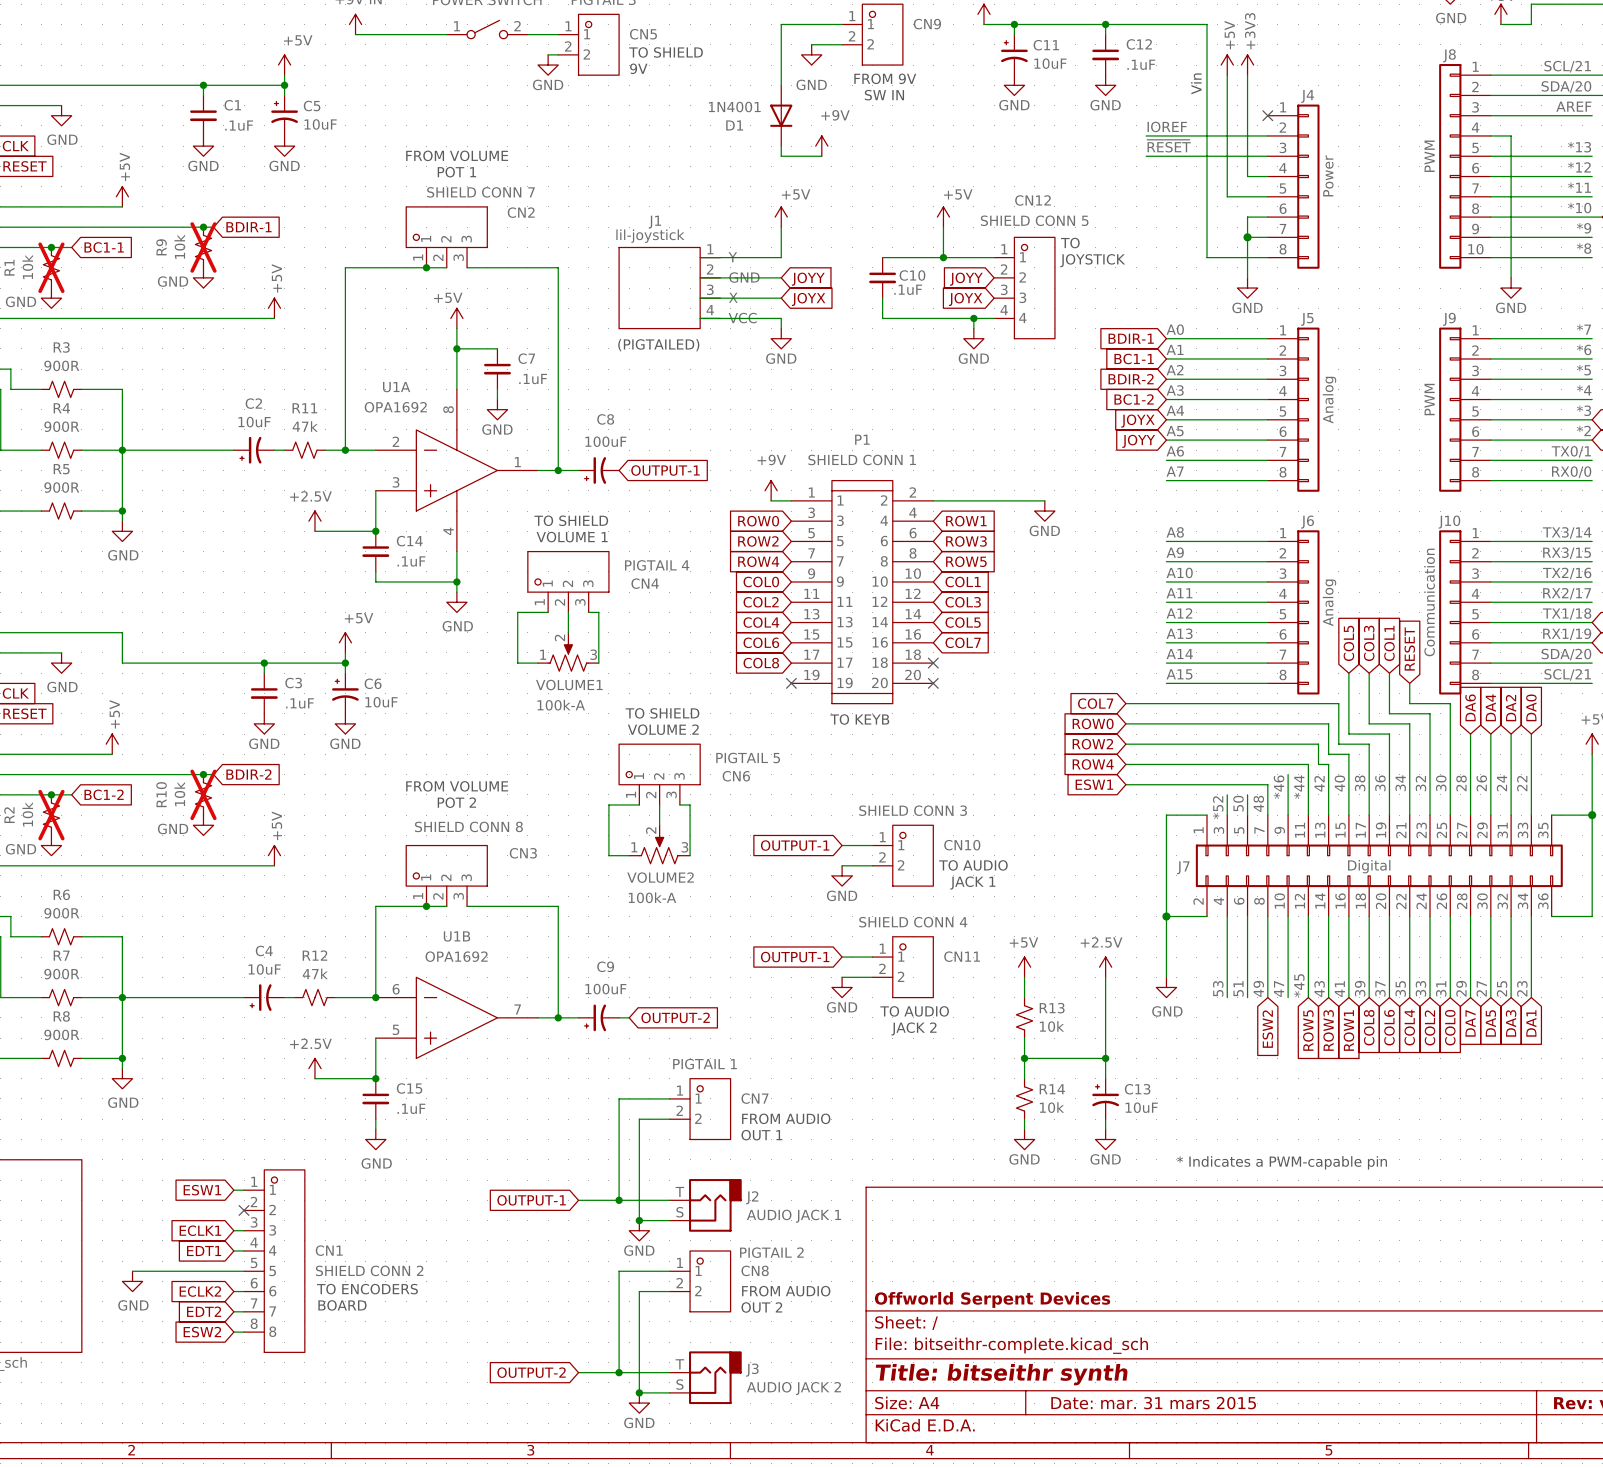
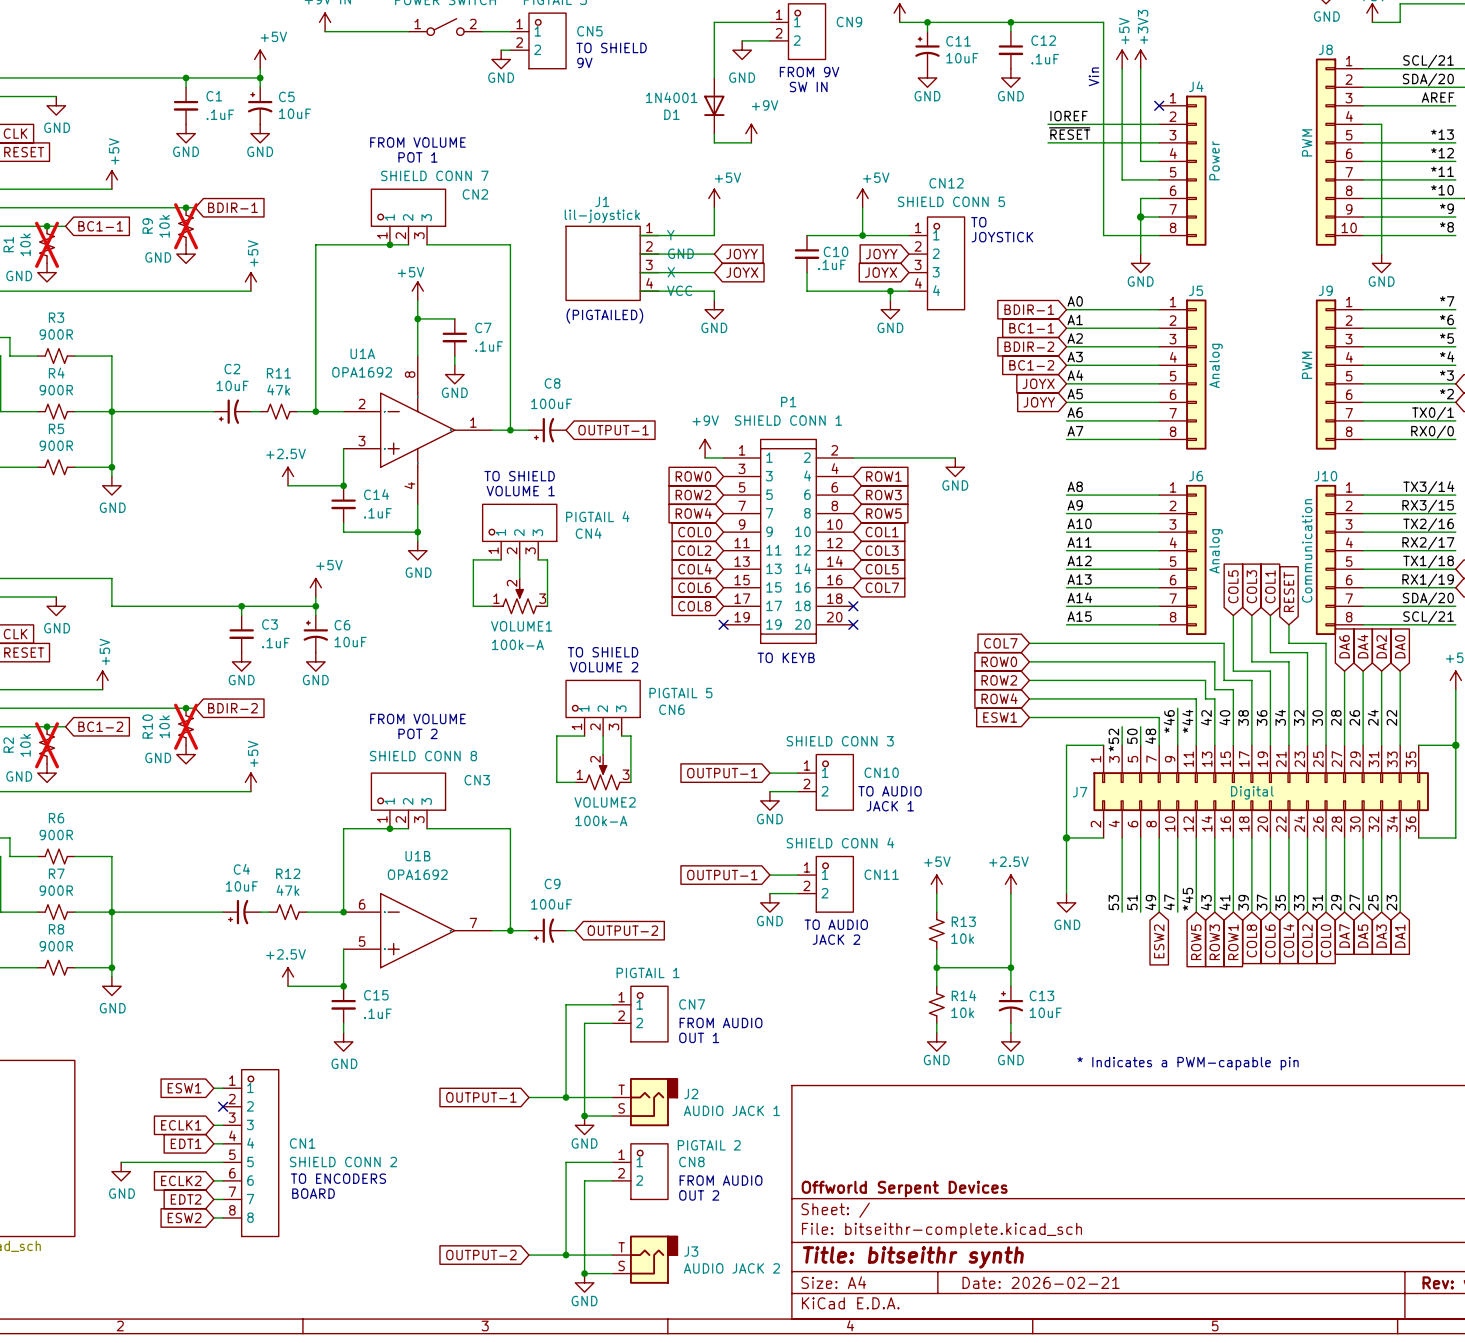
title block: Date: mar. 31 mars 2015 (1153, 1403) -> Date: 2026-02-21 (1041, 1282)

